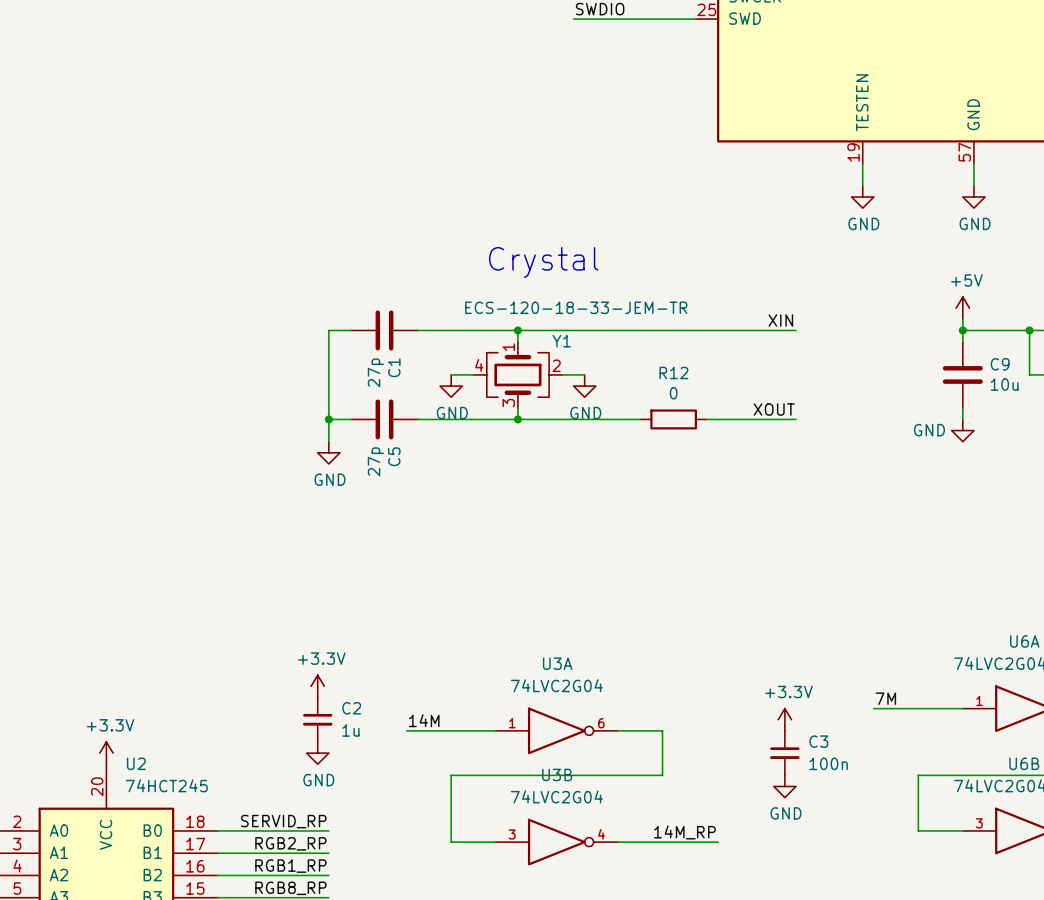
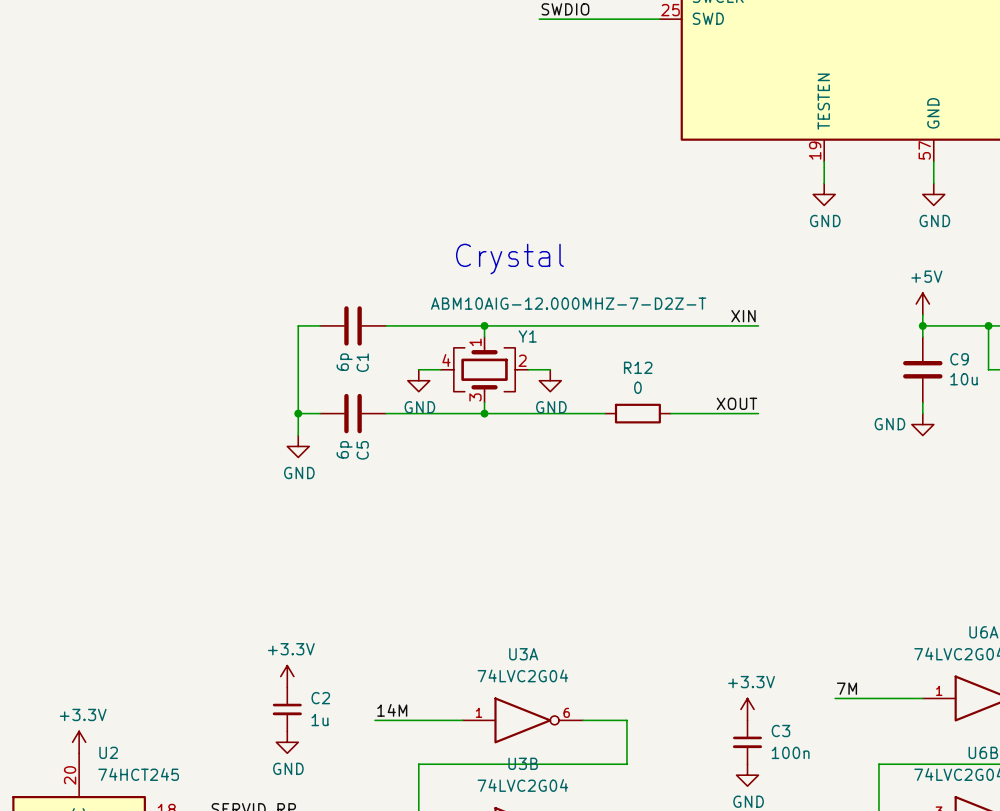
Y1 value: ECS-120-18-33-JEM-TR (576, 307) -> ABM10AIG-12.000MHZ-7-D2Z-T (568, 303)
C1 value: 27p (375, 372) -> 6p (344, 362)
C5 value: 27p (375, 461) -> 6p (344, 449)

